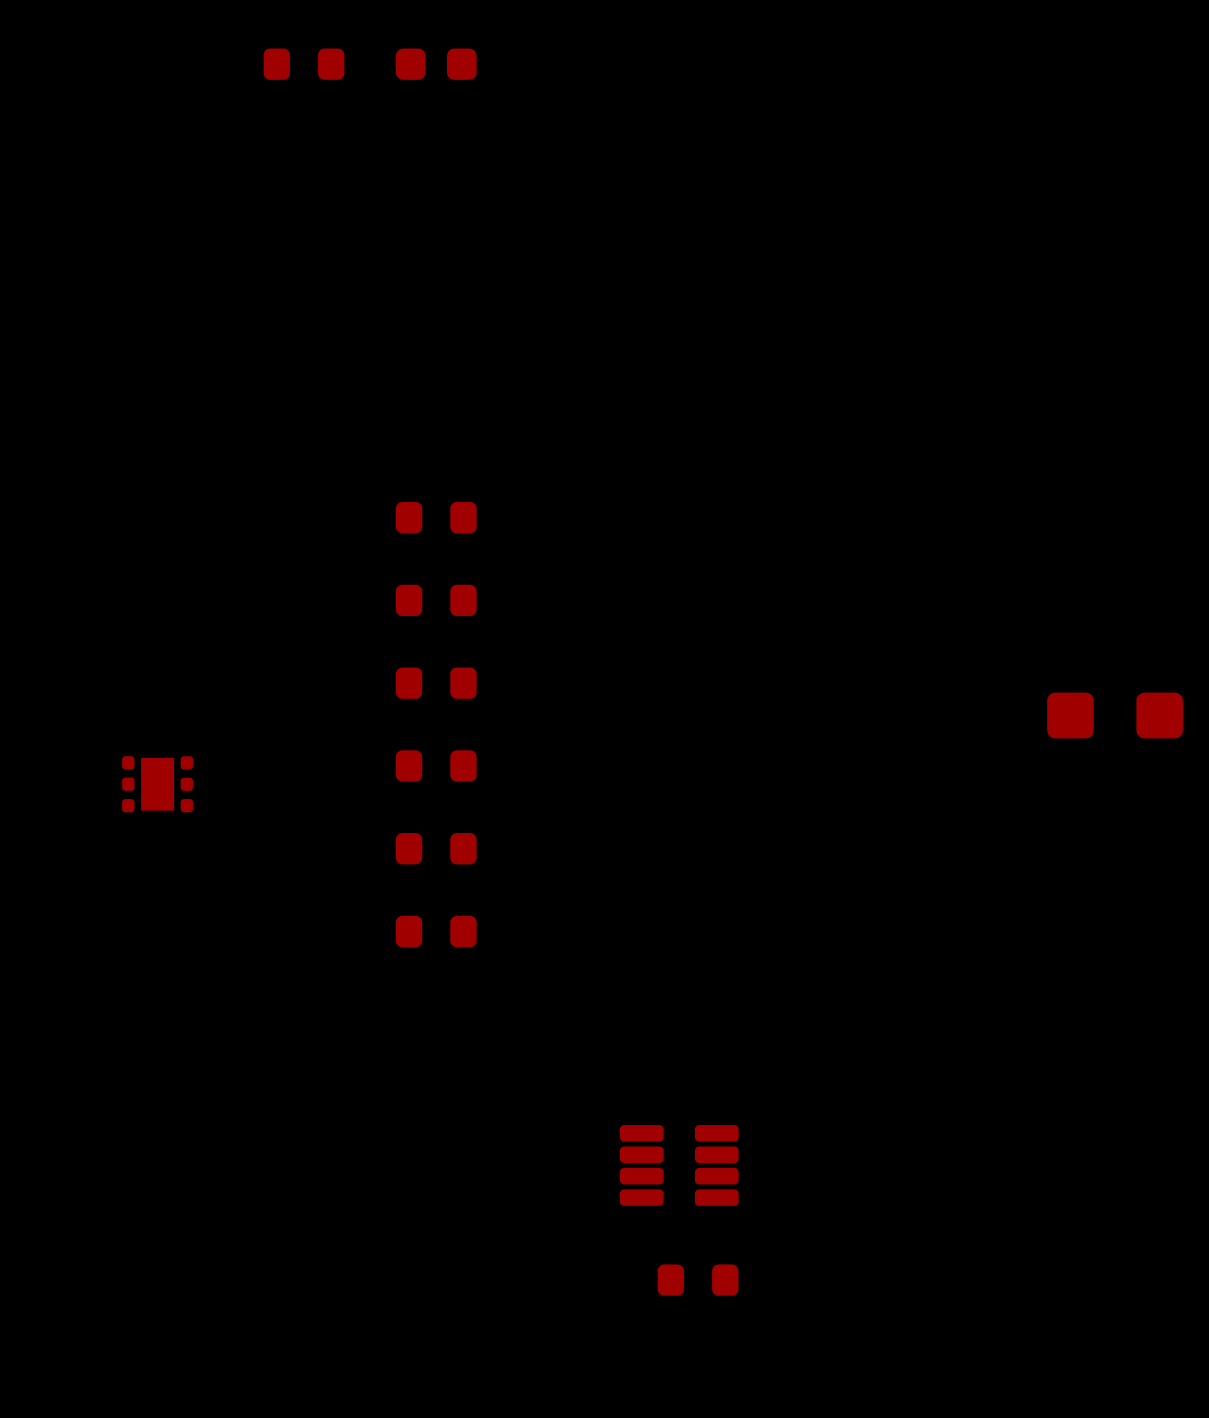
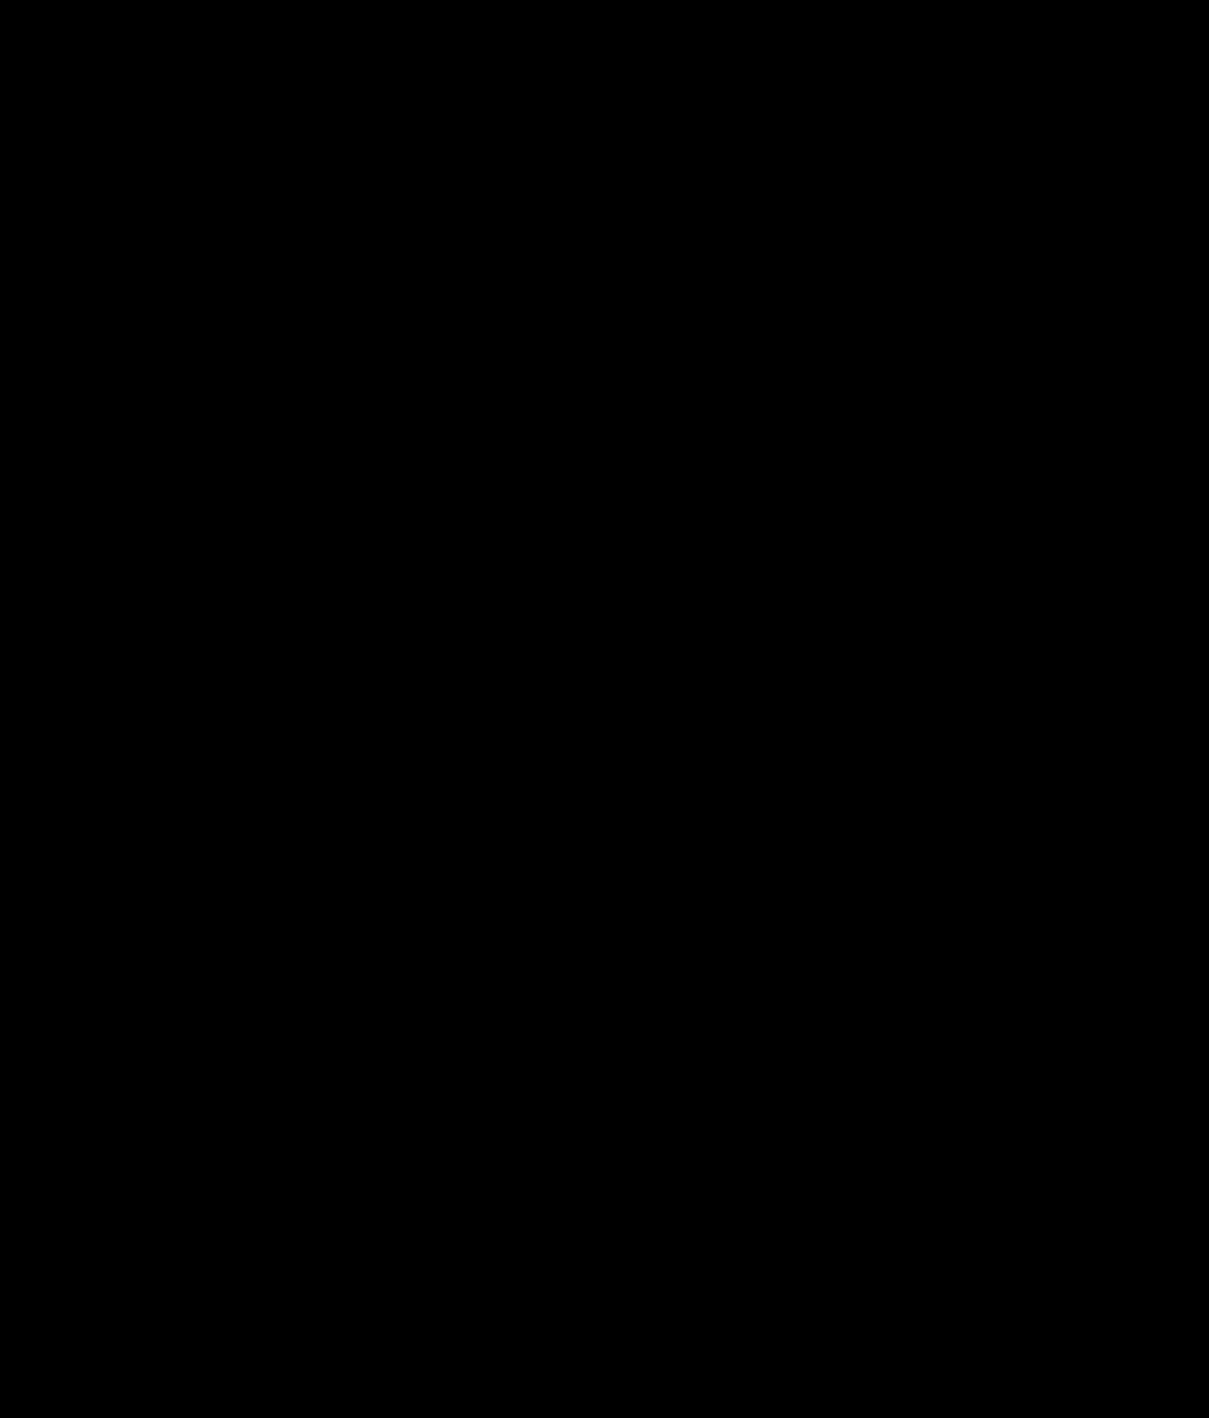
part: (304, 64) -> none
part: (436, 64) -> none
part: (436, 517) -> none
part: (436, 600) -> none
part: (436, 683) -> none
part: (1115, 715) -> none
part: (436, 765) -> none
part: (157, 784) -> none
part: (436, 848) -> none
part: (436, 931) -> none
part: (679, 1165) -> none
part: (698, 1280) -> none

